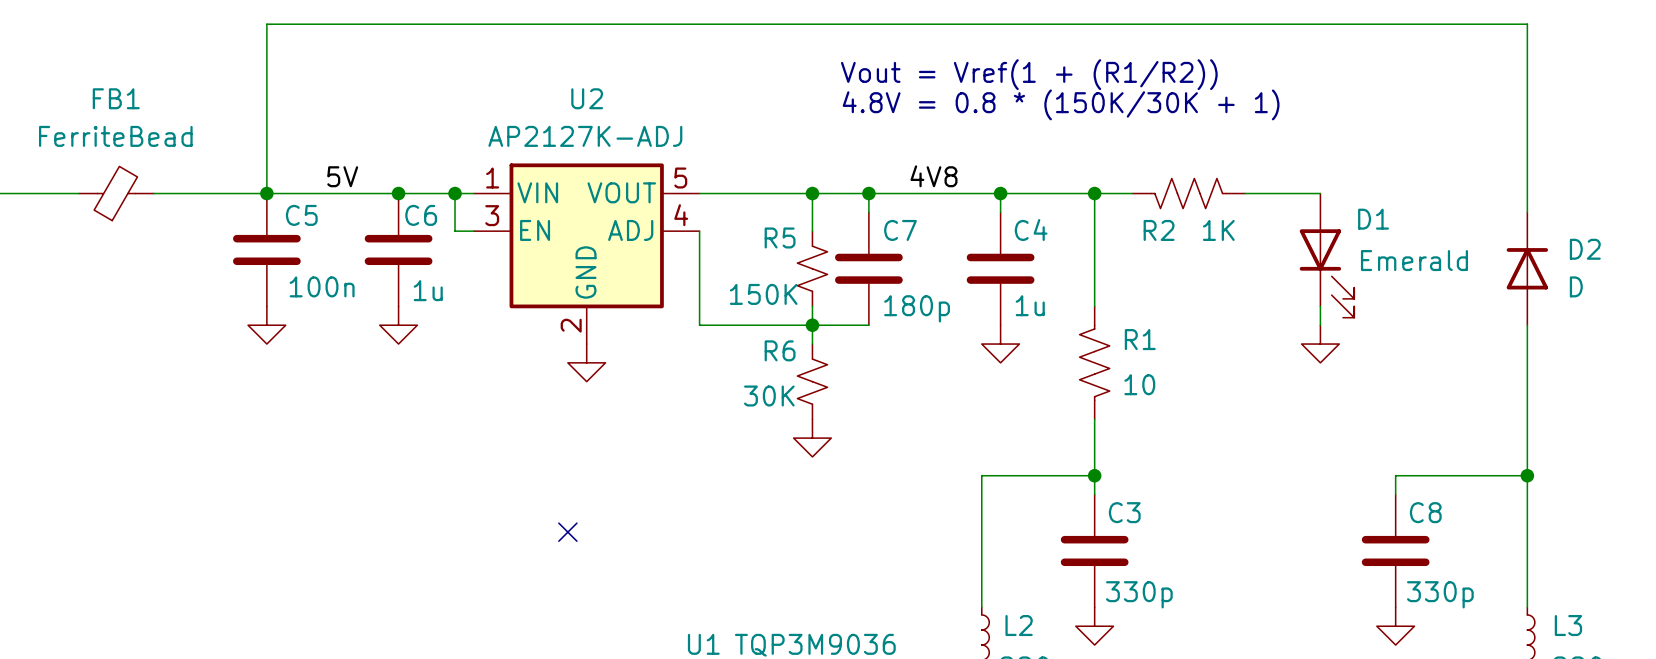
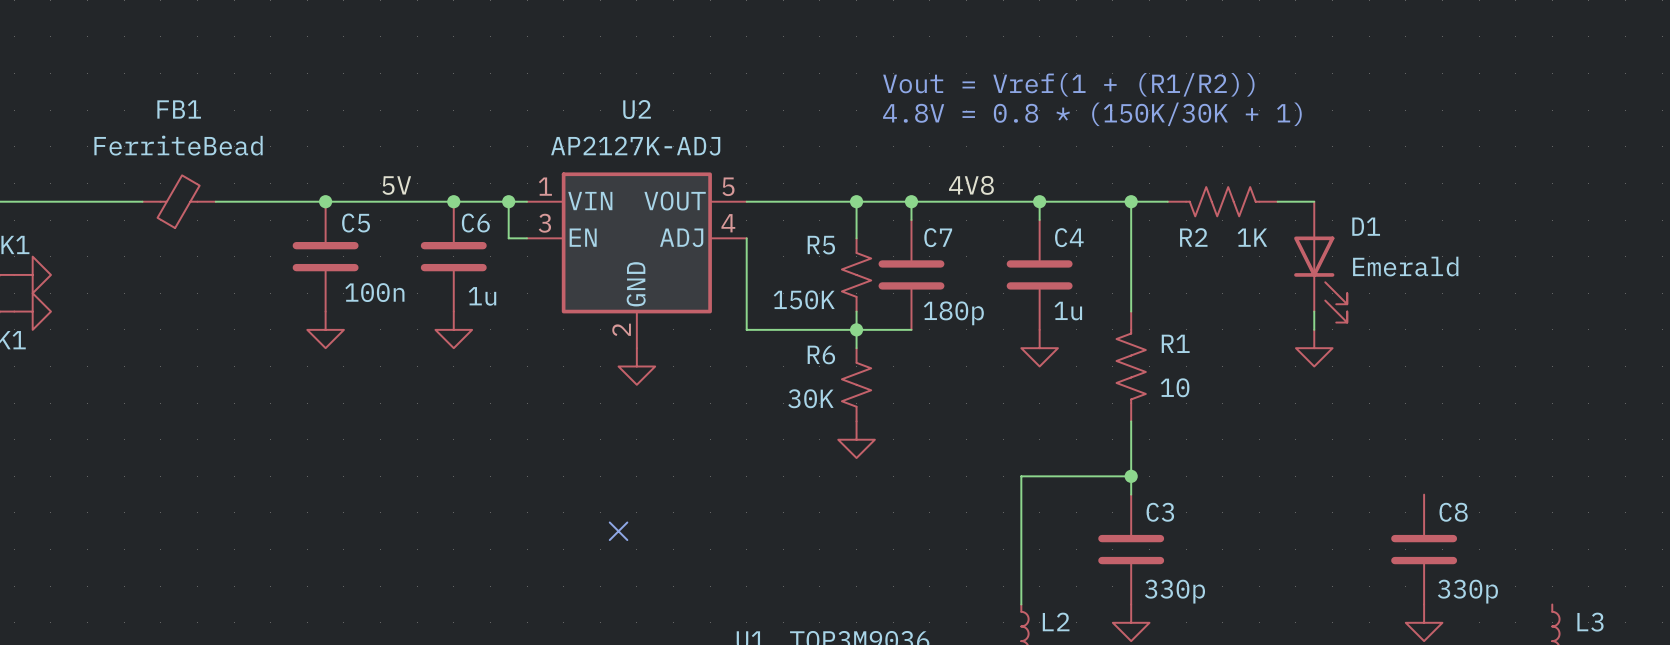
wire: (266, 193) (266, 24) (1527, 24) (1527, 212) -> none
wire: (1282, 193) (1320, 193) -> none
D1 position: (1326, 255) -> (1320, 262)
D2: D (1527, 268) -> none
wire: (1320, 306) (1320, 325) -> (1314, 311) (1314, 329)
wire: (1527, 325) (1527, 607) -> none
power symbol position: (1320, 344) -> (1314, 348)
wire: (1527, 475) (1395, 475) (1395, 494) -> none
junction: (1527, 475) -> none

